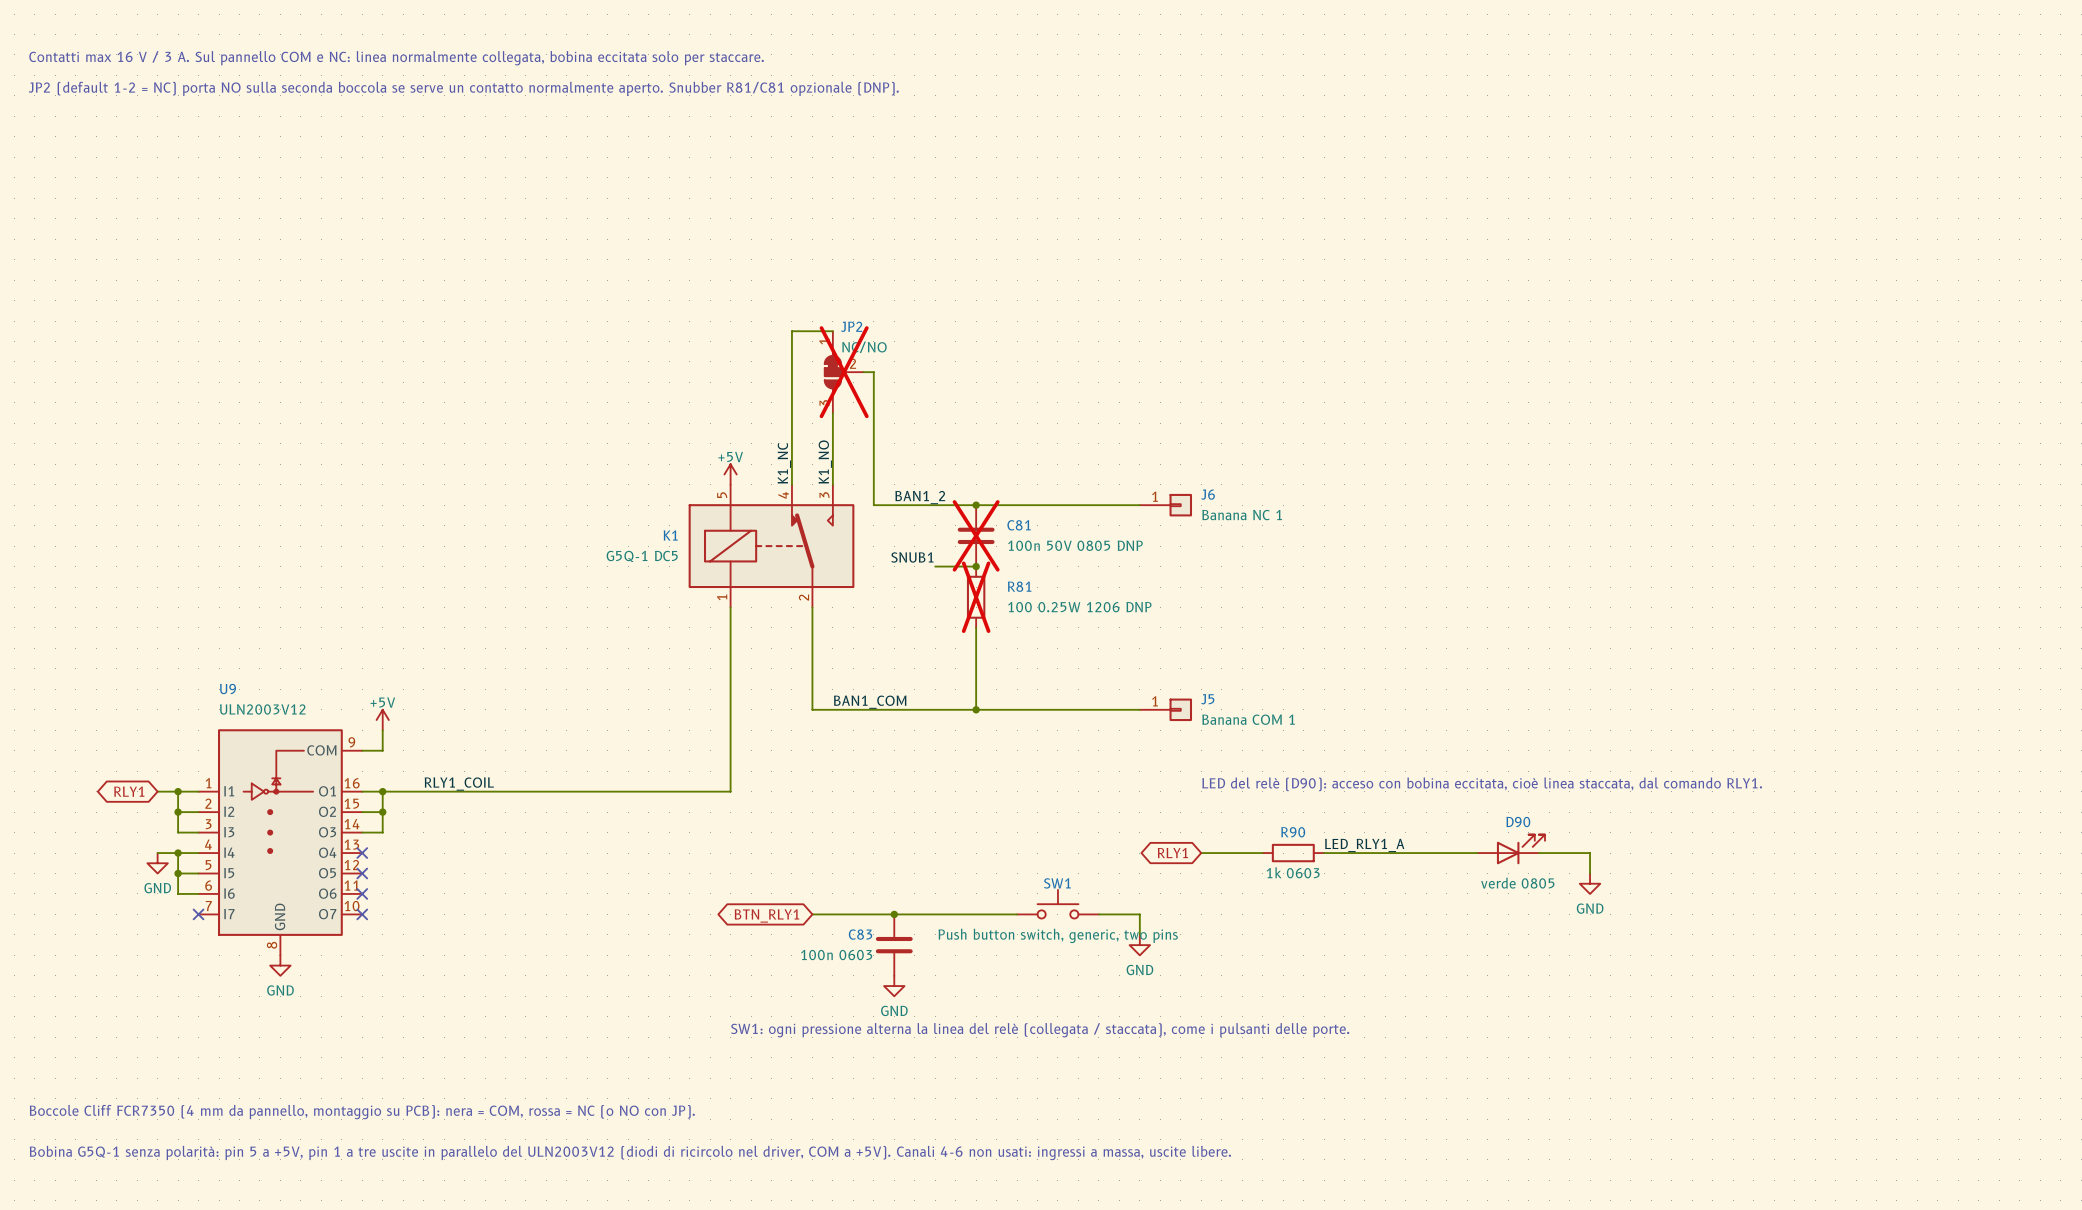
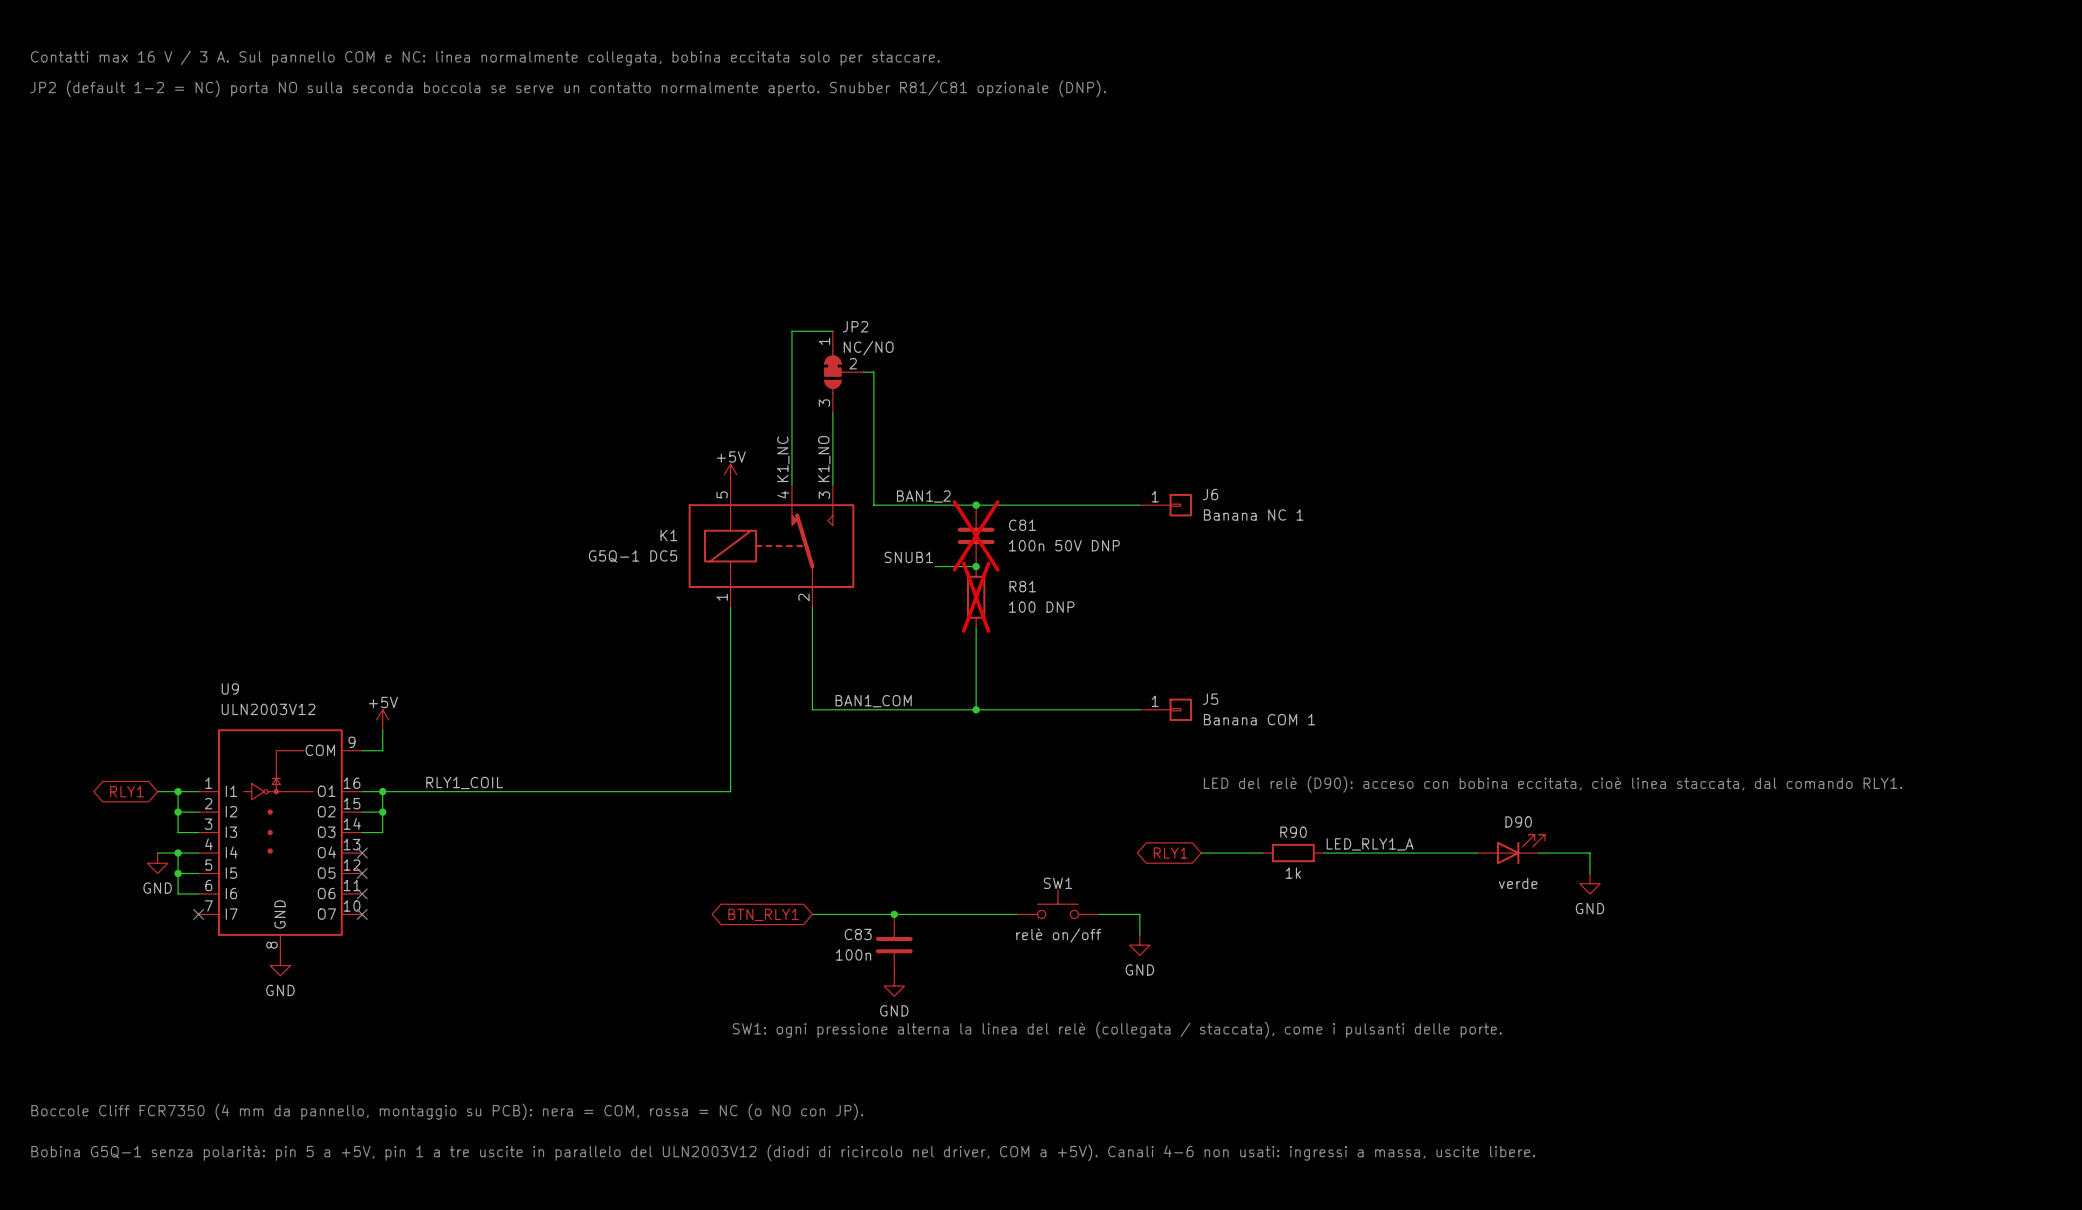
JP2 do-not-place cross: (844, 372) -> none
C81 value: 100n 50V 0805 DNP (1075, 545) -> 100n 50V DNP (1064, 545)
R81 value: 100 0.25W 1206 DNP (1079, 607) -> 100 DNP (1041, 607)
R90 value: 1k 0603 (1293, 872) -> 1k (1293, 873)
D90 value: verde 0805 (1517, 883) -> verde (1518, 883)
SW1 value: Push button switch, generic, two pins (1058, 935) -> relè on/off (1058, 935)
C83 value: 100n 0603 (836, 955) -> 100n (853, 954)

